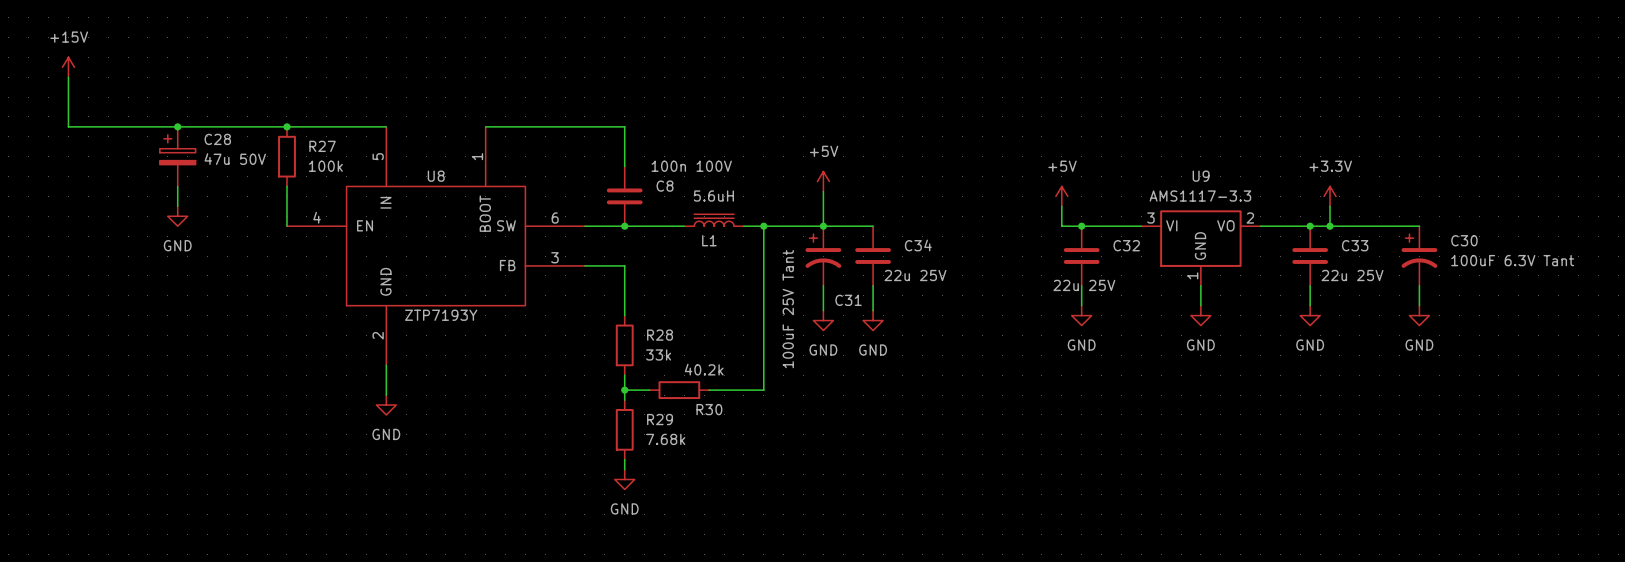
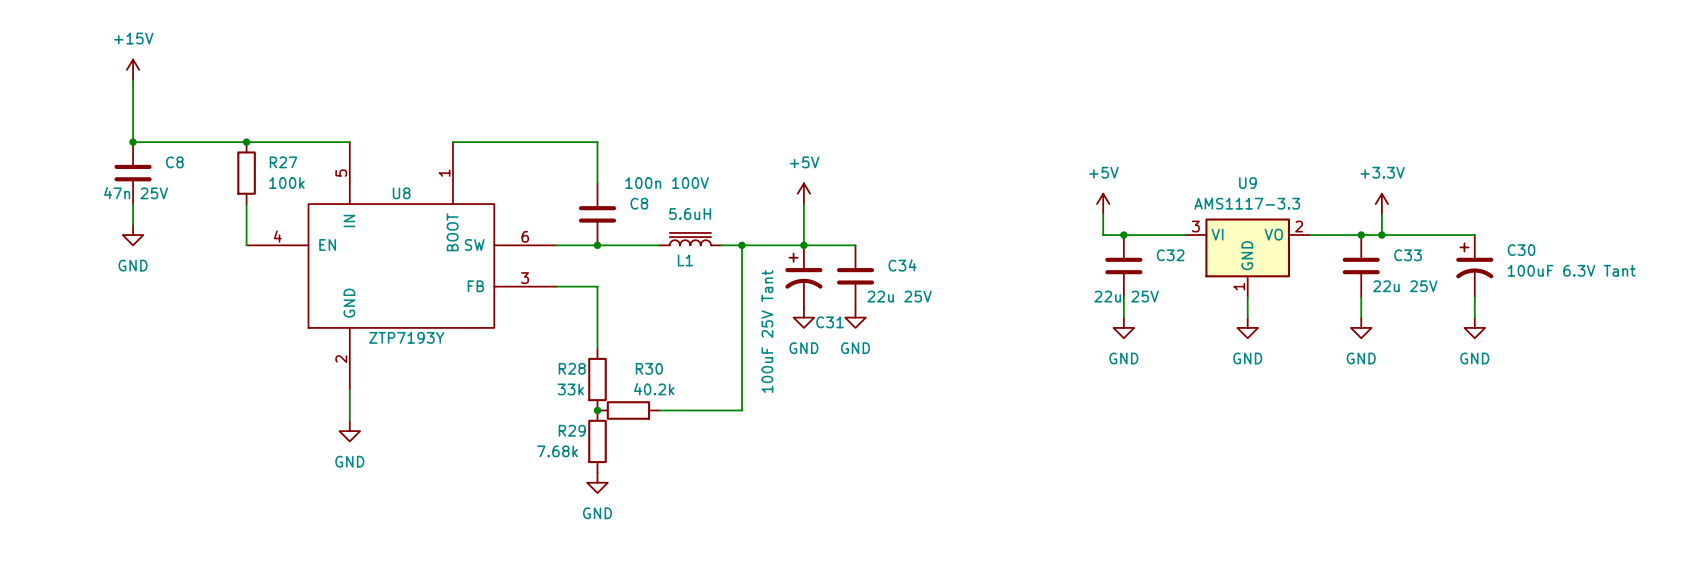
power symbol position: +15V (68, 67) -> +15V (133, 69)
wire: (68, 77) (68, 126) (386, 126) -> none
wire: none -> (133, 80) (133, 142) (349, 142)
junction: (177, 126) -> none
junction: (286, 126) -> none
wire: (485, 126) (624, 126) (624, 166) -> (453, 142) (597, 142) (597, 183)
junction: none -> (133, 142)
junction: none -> (246, 142)
C28: 47u 50V (177, 156) -> none
R27 position: (286, 156) -> (246, 173)
C8: none -> 47n 25V (133, 173)
power symbol position: +5V (823, 181) -> +5V (803, 193)
wire: (177, 186) (177, 206) -> (133, 204) (133, 224)
wire: (286, 186) (286, 226) -> (246, 204) (246, 245)
wire: (823, 191) (823, 226) -> none
C8 position: (624, 196) -> (597, 214)
wire: none -> (803, 204) (803, 245)
power symbol position: GND (177, 216) -> GND (133, 235)
L1 position: (714, 220) -> (690, 239)
wire: (584, 226) (684, 226) -> (556, 245) (659, 245)
junction: (624, 226) -> none
wire: (743, 226) (873, 226) -> (721, 245) (855, 245)
wire: (763, 226) (763, 390) (709, 390) -> none
junction position: (763, 226) -> (803, 245)
junction: (823, 226) -> none
junction: none -> (597, 245)
wire: none -> (741, 245) (741, 410) (659, 410)
junction: none -> (741, 245)
U8 position: (435, 246) -> (401, 265)
C31 position: (823, 256) -> (803, 276)
C34 position: (873, 256) -> (855, 276)
wire: (584, 265) (624, 265) (624, 315) -> none
wire: none -> (556, 286) (597, 286) (597, 348)
wire: (873, 285) (873, 310) -> none
power symbol: none -> GND (803, 317)
power symbol position: GND (823, 320) -> GND (855, 317)
power symbol: GND (873, 320) -> none
R28 name position: R28 (660, 335) -> R28 (572, 368)
R28 position: (624, 345) -> (597, 379)
R28 value position: 33k (658, 354) -> 33k (570, 389)
wire: (386, 365) (386, 395) -> (349, 389) (349, 420)
wire: (624, 390) (649, 390) -> none
junction: (624, 390) -> none
R30 position: (679, 390) -> (628, 410)
junction: none -> (597, 410)
power symbol position: GND (386, 405) -> GND (349, 431)
R30 name position: R30 (709, 409) -> R30 (649, 368)
R29 name position: R29 (660, 419) -> R29 (572, 430)
R29 position: (624, 429) -> (597, 441)
R29 value position: 7.68k (665, 439) -> 7.68k (557, 451)
wire: (624, 459) (624, 469) -> none
power symbol position: GND (624, 479) -> GND (597, 482)

